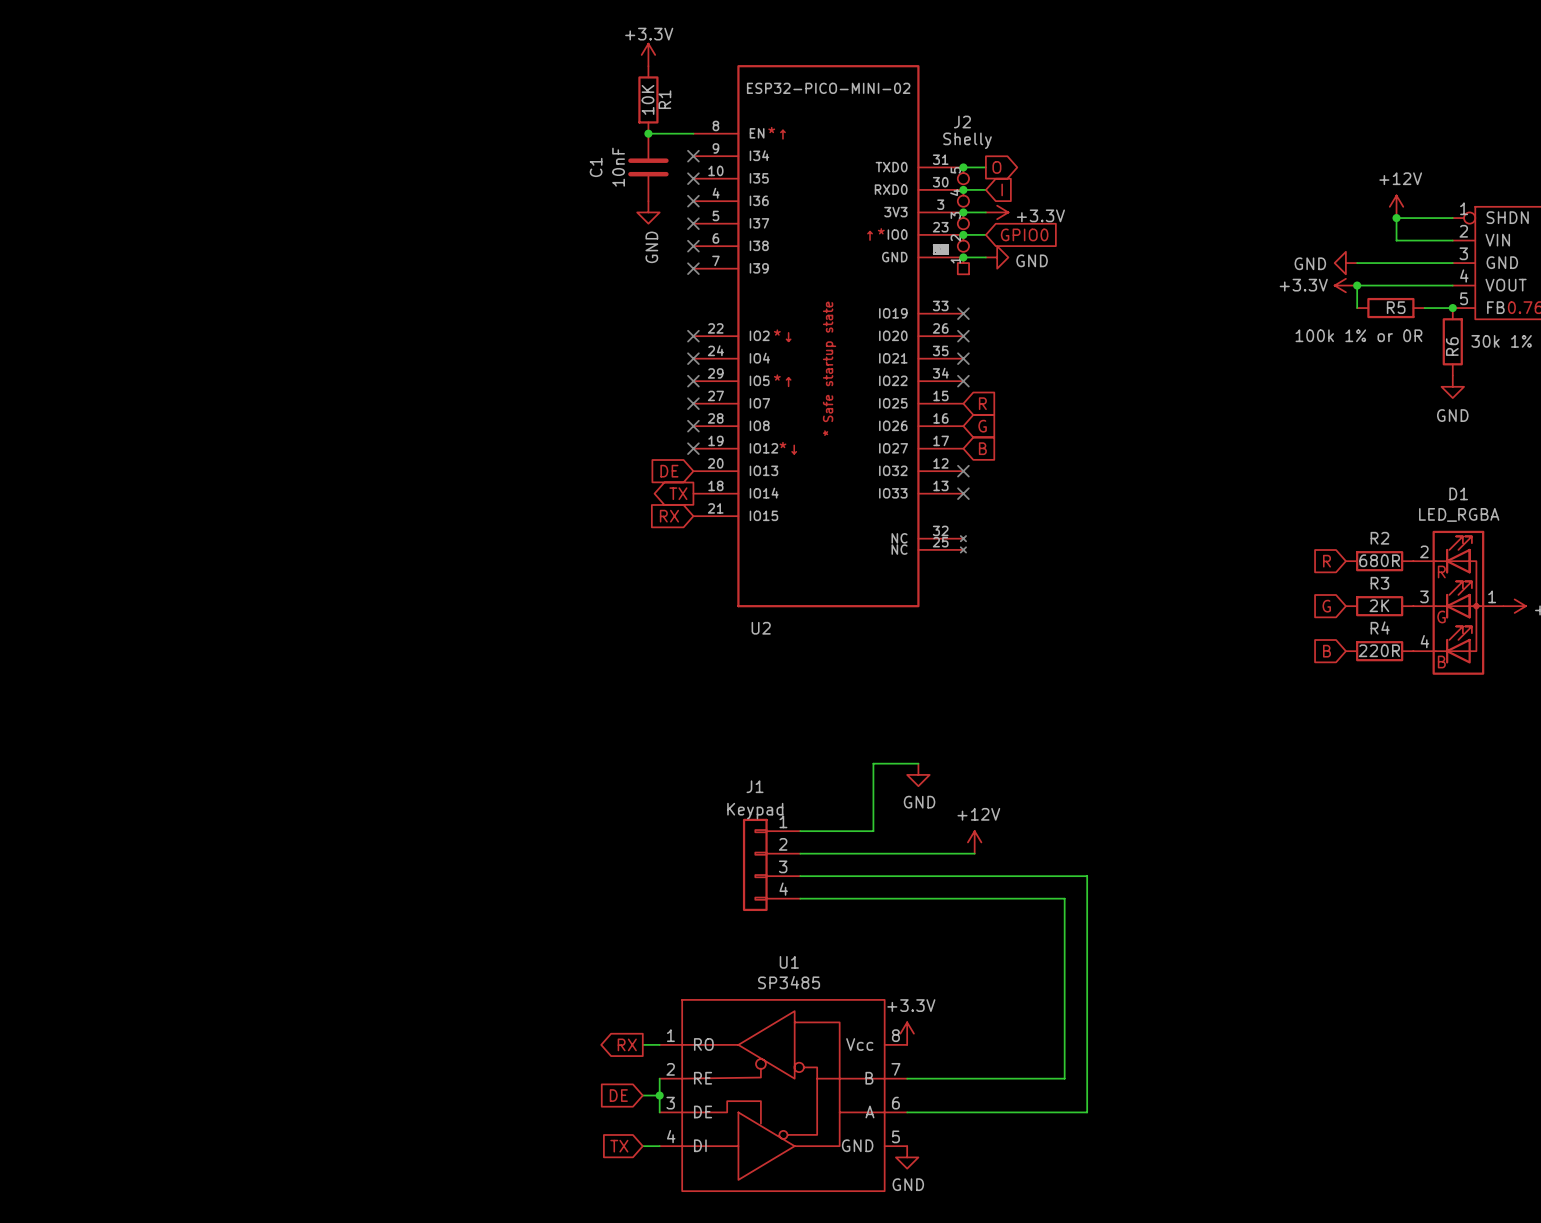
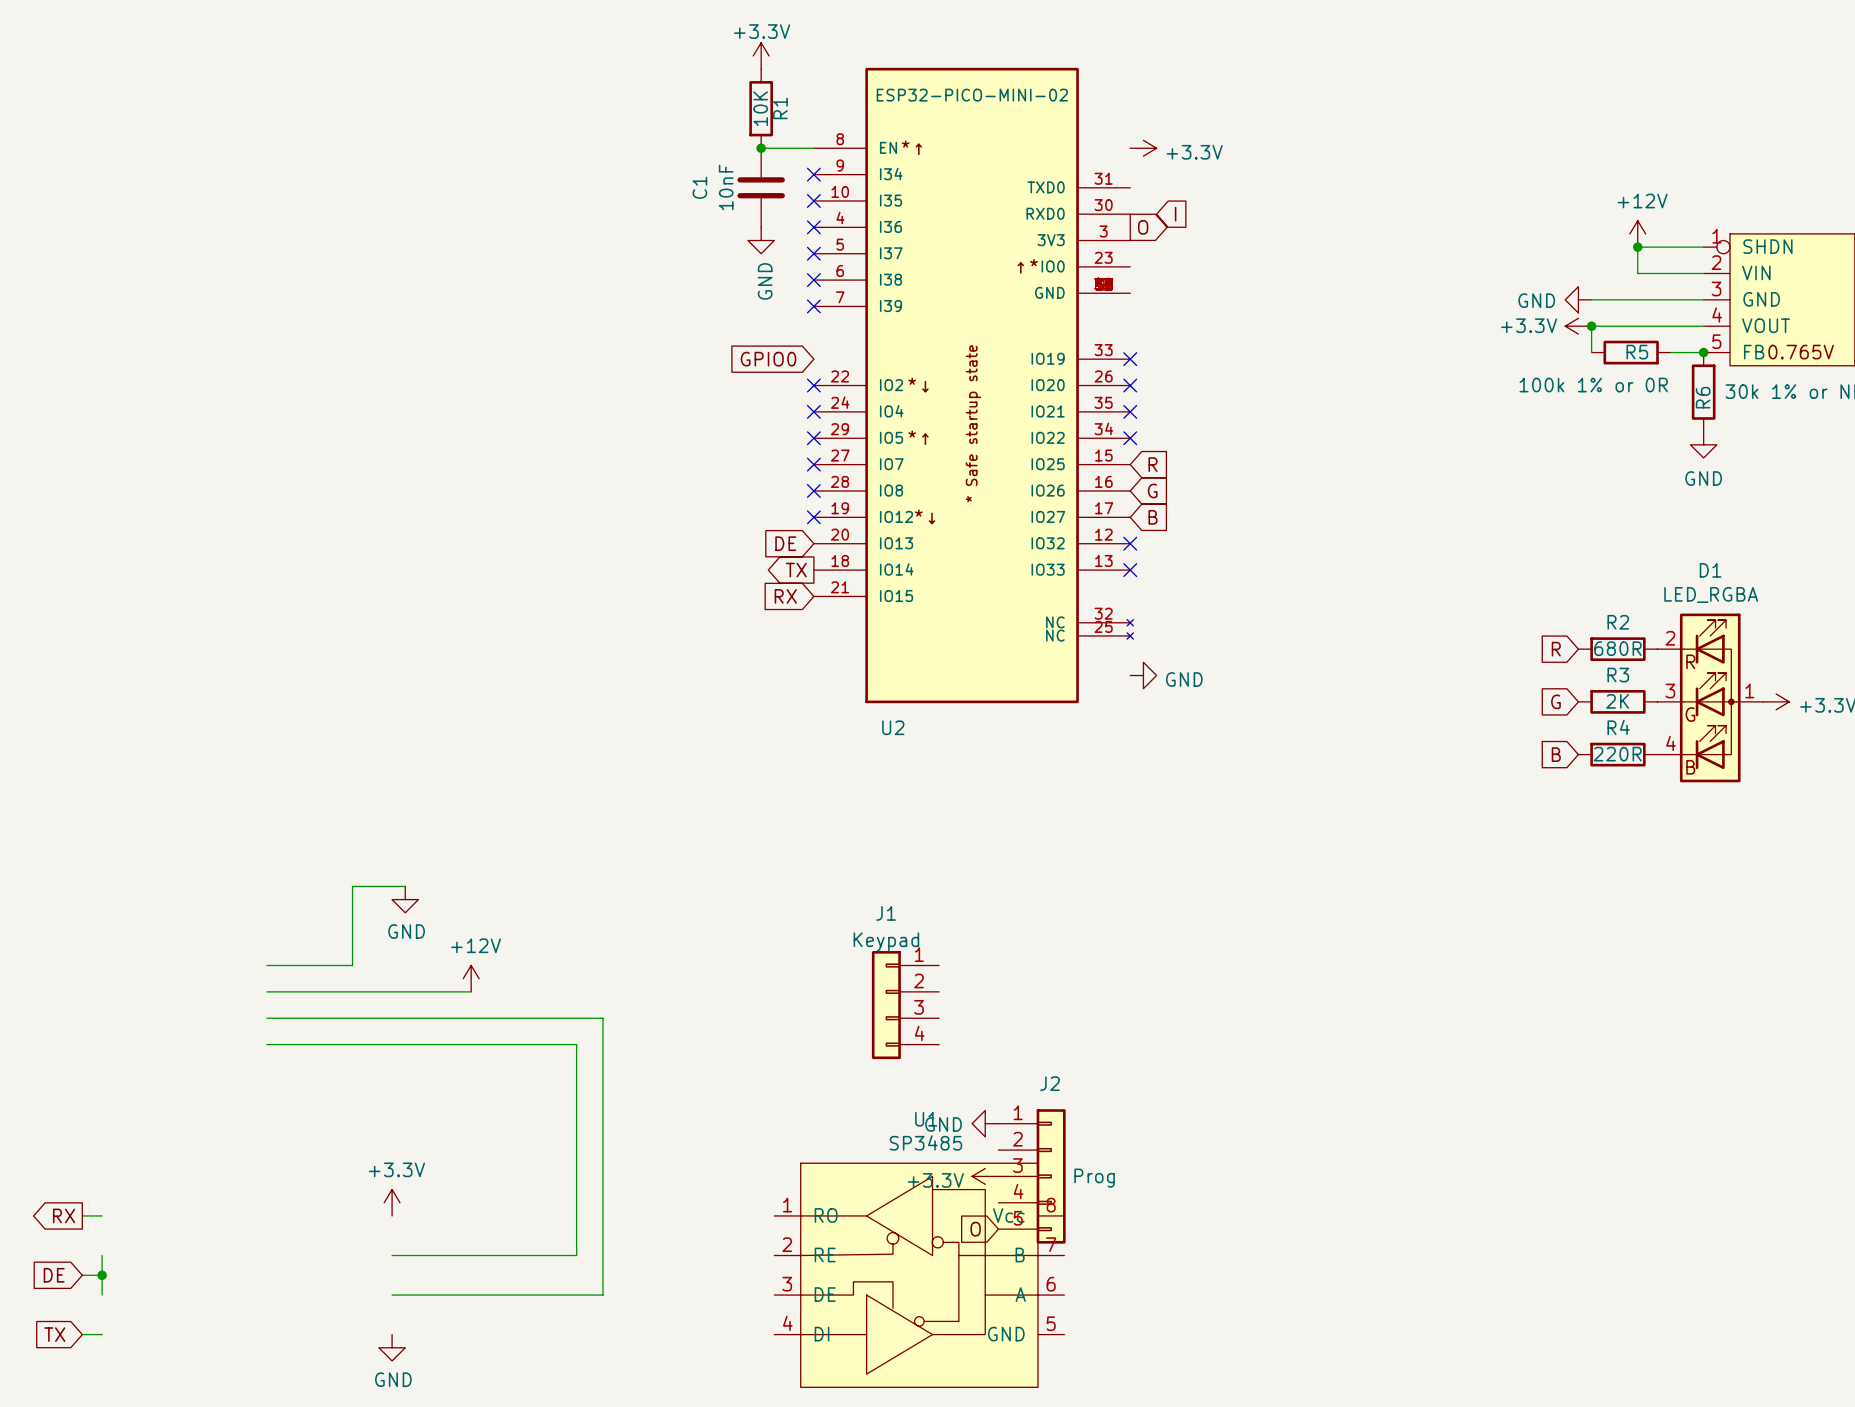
J2 name position: J2 (962, 122) -> J2 (1050, 1083)
J2 value: Shelly (967, 140) -> Prog (1094, 1178)
J2 symbol: [957, 167, 970, 275] -> [998, 1109, 1066, 1244]
wire: (963, 167) (985, 167) -> none
junction: (963, 167) -> none
global label position: O (996, 167) -> O (1143, 227)
junction: (963, 189) -> none
junction: (963, 212) -> none
power symbol position: +3.3V (997, 212) -> +3.3V (1143, 148)
wire: (963, 234) (985, 234) -> none
junction: (963, 234) -> none
global label: GPIO0 (1024, 234) -> none
wire: (963, 257) (985, 257) -> none
junction: (963, 257) -> none
power symbol: GND (997, 257) -> none
global label: none -> GPIO0 (768, 359)
power symbol: none -> GND (1143, 675)
wire: none -> (405, 886) (352, 886) (352, 965) (266, 965)
wire: (918, 763) (873, 763) (873, 831) (800, 831) -> none
power symbol: none -> GND (405, 899)
power symbol: GND (918, 774) -> none
power symbol: none -> +12V (471, 978)
power symbol: +12V (974, 842) -> none
wire: none -> (266, 991) (471, 991)
wire: (800, 853) (974, 853) -> none
wire: none -> (266, 1018) (602, 1018) (602, 1295) (392, 1295)
wire: (800, 876) (1087, 876) (1087, 1112) (907, 1112) -> none
wire: none -> (266, 1044) (576, 1044) (576, 1255) (392, 1255)
wire: (800, 898) (1064, 898) (1064, 1078) (907, 1078) -> none
power symbol: none -> GND (985, 1123)
power symbol text position: +3.3V (911, 1005) -> +3.3V (935, 1180)
power symbol: none -> +3.3V (392, 1202)
power symbol rotation: 0° (907, 1033) -> 90° counterclockwise (985, 1176)
power symbol position: +3.3V (907, 1033) -> +3.3V (985, 1176)
global label: none -> RX (64, 1215)
wire: none -> (82, 1215) (102, 1215)
global label: RX (627, 1044) -> none
wire: (642, 1044) (659, 1044) -> none
global label: none -> O (975, 1229)
wire: none -> (102, 1255) (102, 1295)
wire: (659, 1078) (659, 1112) -> none
global label: none -> DE (54, 1275)
wire: none -> (82, 1275) (102, 1275)
junction: none -> (102, 1275)
global label: DE (618, 1095) -> none
wire: (642, 1095) (659, 1095) -> none
junction: (659, 1095) -> none
global label: none -> TX (54, 1334)
wire: none -> (82, 1334) (102, 1334)
global label: TX (619, 1146) -> none
wire: (642, 1146) (659, 1146) -> none
power symbol: none -> GND (392, 1347)
power symbol: GND (907, 1157) -> none

